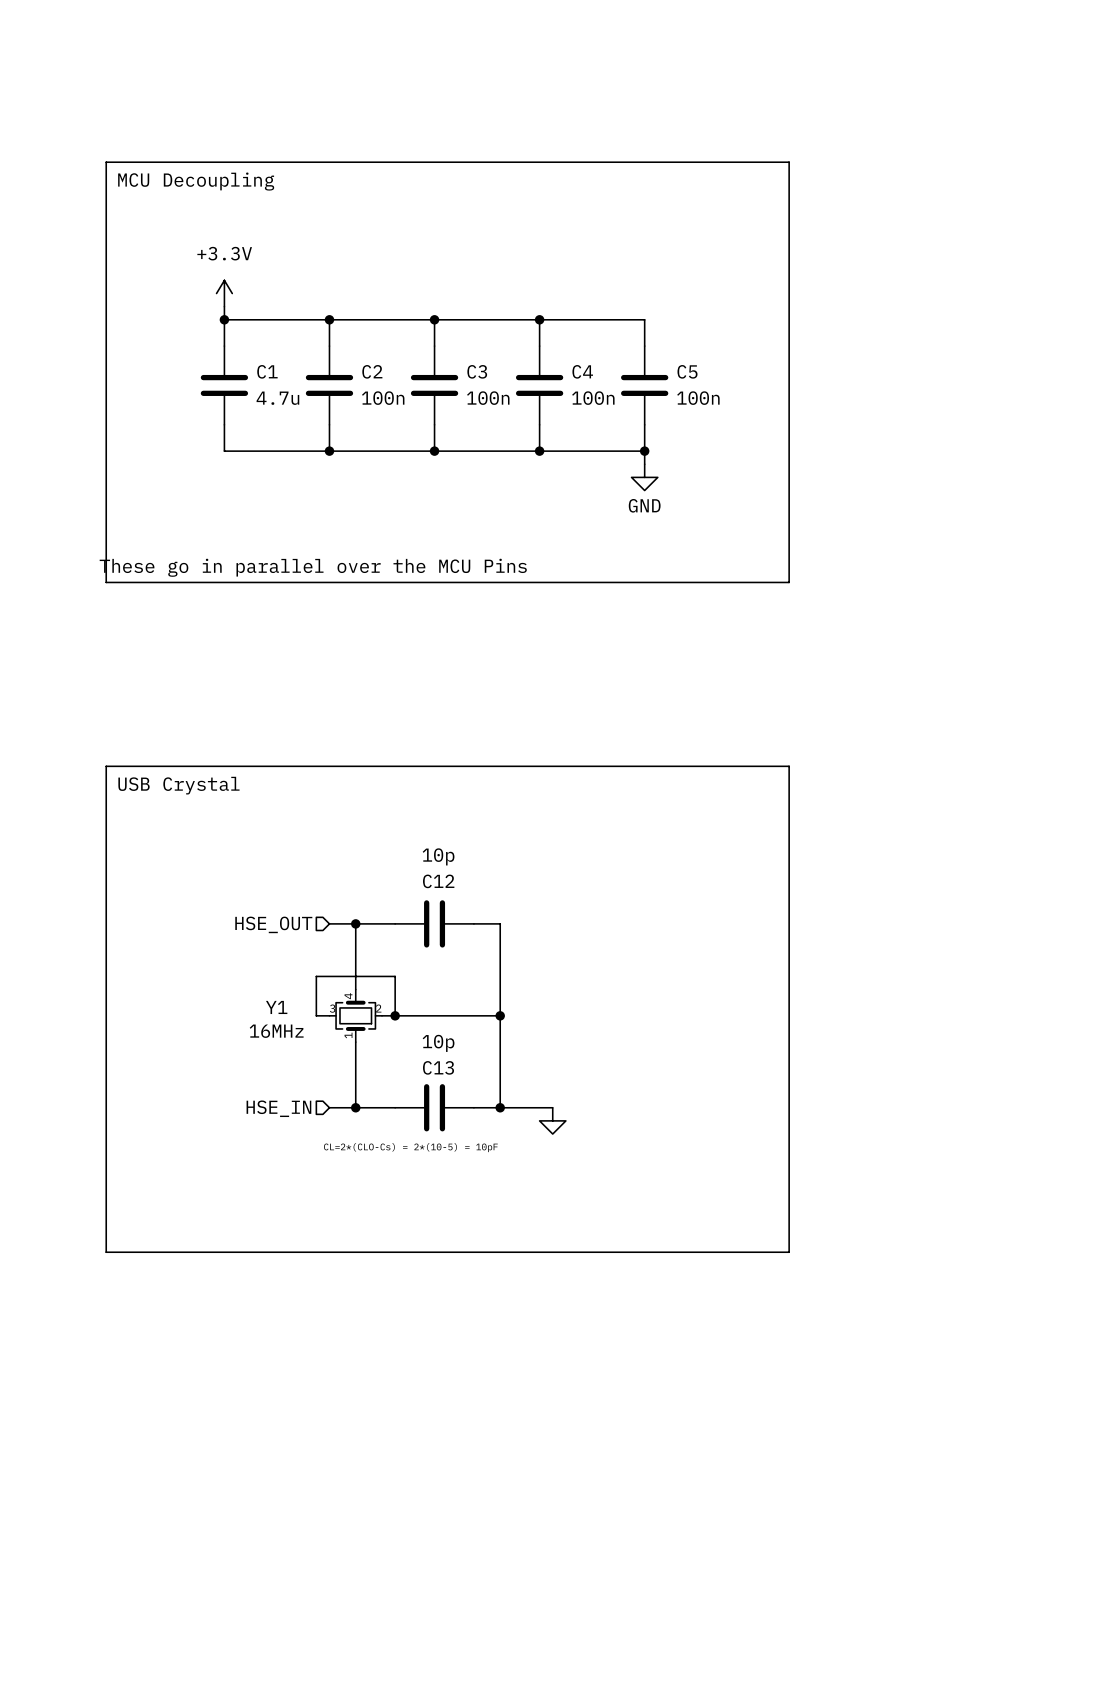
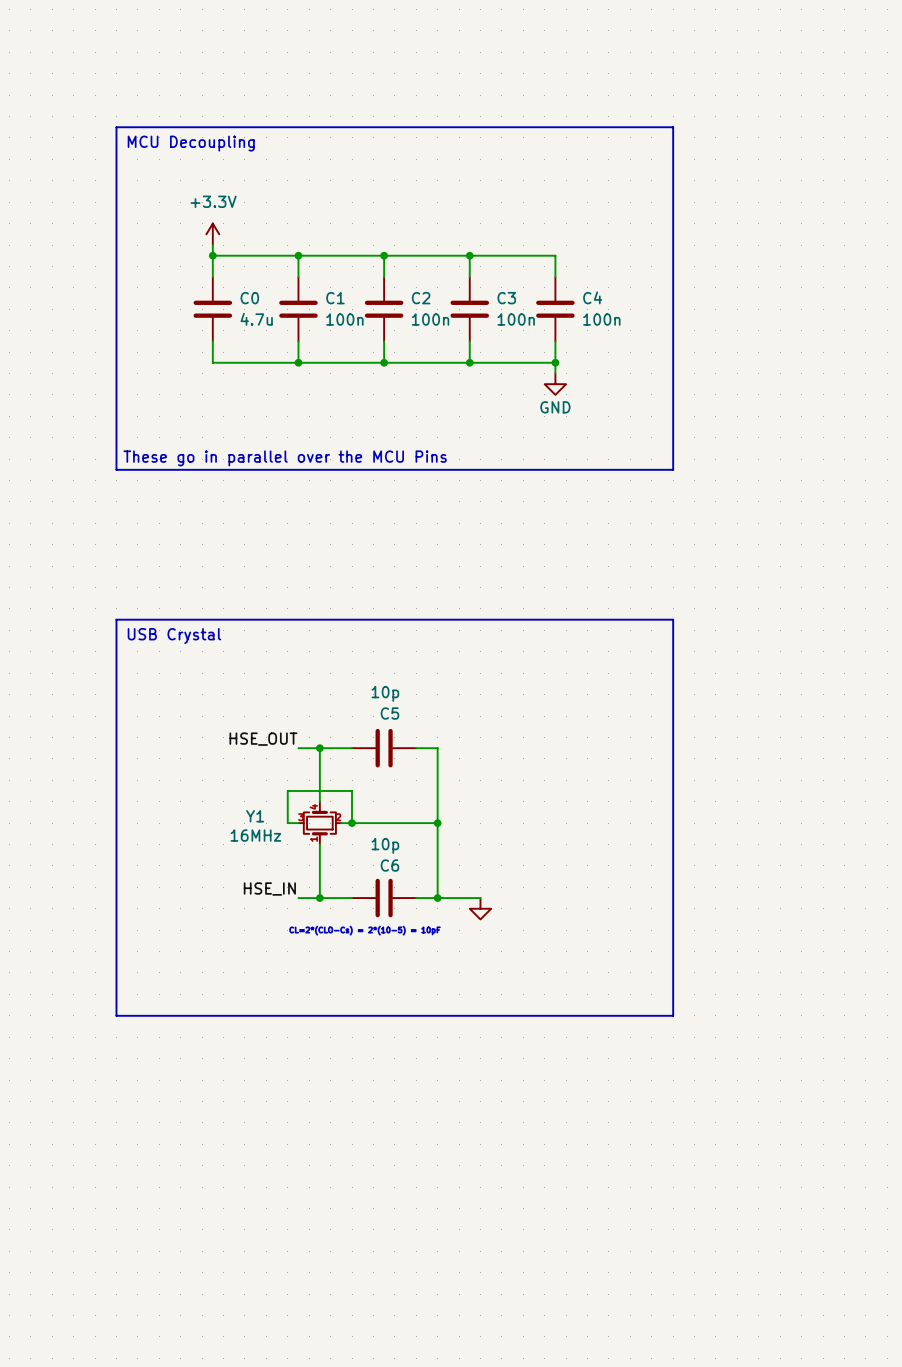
C1 name: C1 (267, 371) -> C0 (249, 298)
C2 name: C2 (372, 371) -> C1 (335, 298)
C3 name: C3 (477, 371) -> C2 (421, 298)
C4 name: C4 (582, 371) -> C3 (506, 298)
C5 name: C5 (687, 371) -> C4 (592, 297)
C12 name: C12 (438, 881) -> C5 (389, 713)
label: none -> HSE_OUT (263, 739)
hierarchical label: HSE_OUT (273, 924) -> none
C13 name: C13 (438, 1067) -> C6 (389, 865)
label: none -> HSE_IN (269, 889)
hierarchical label: HSE_IN (278, 1108) -> none

